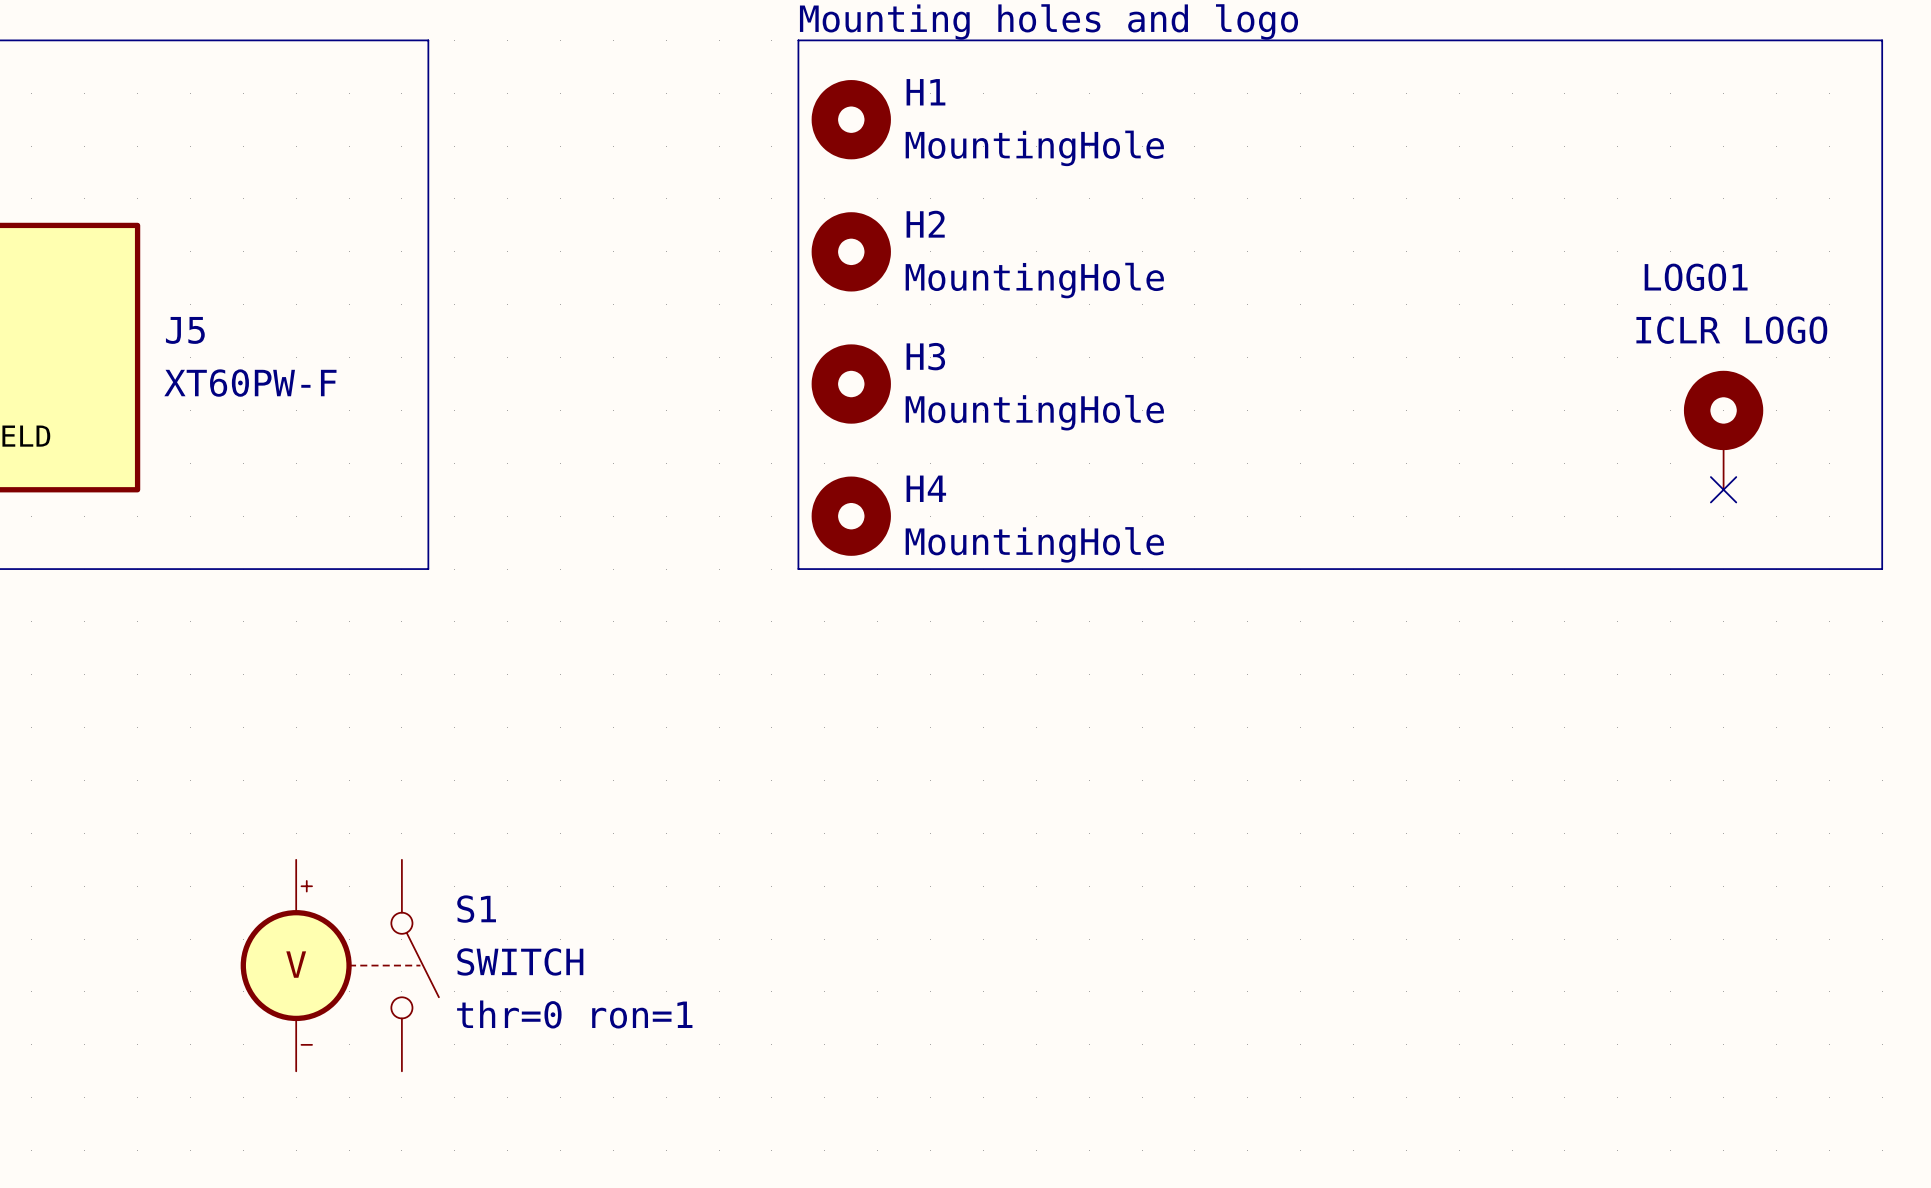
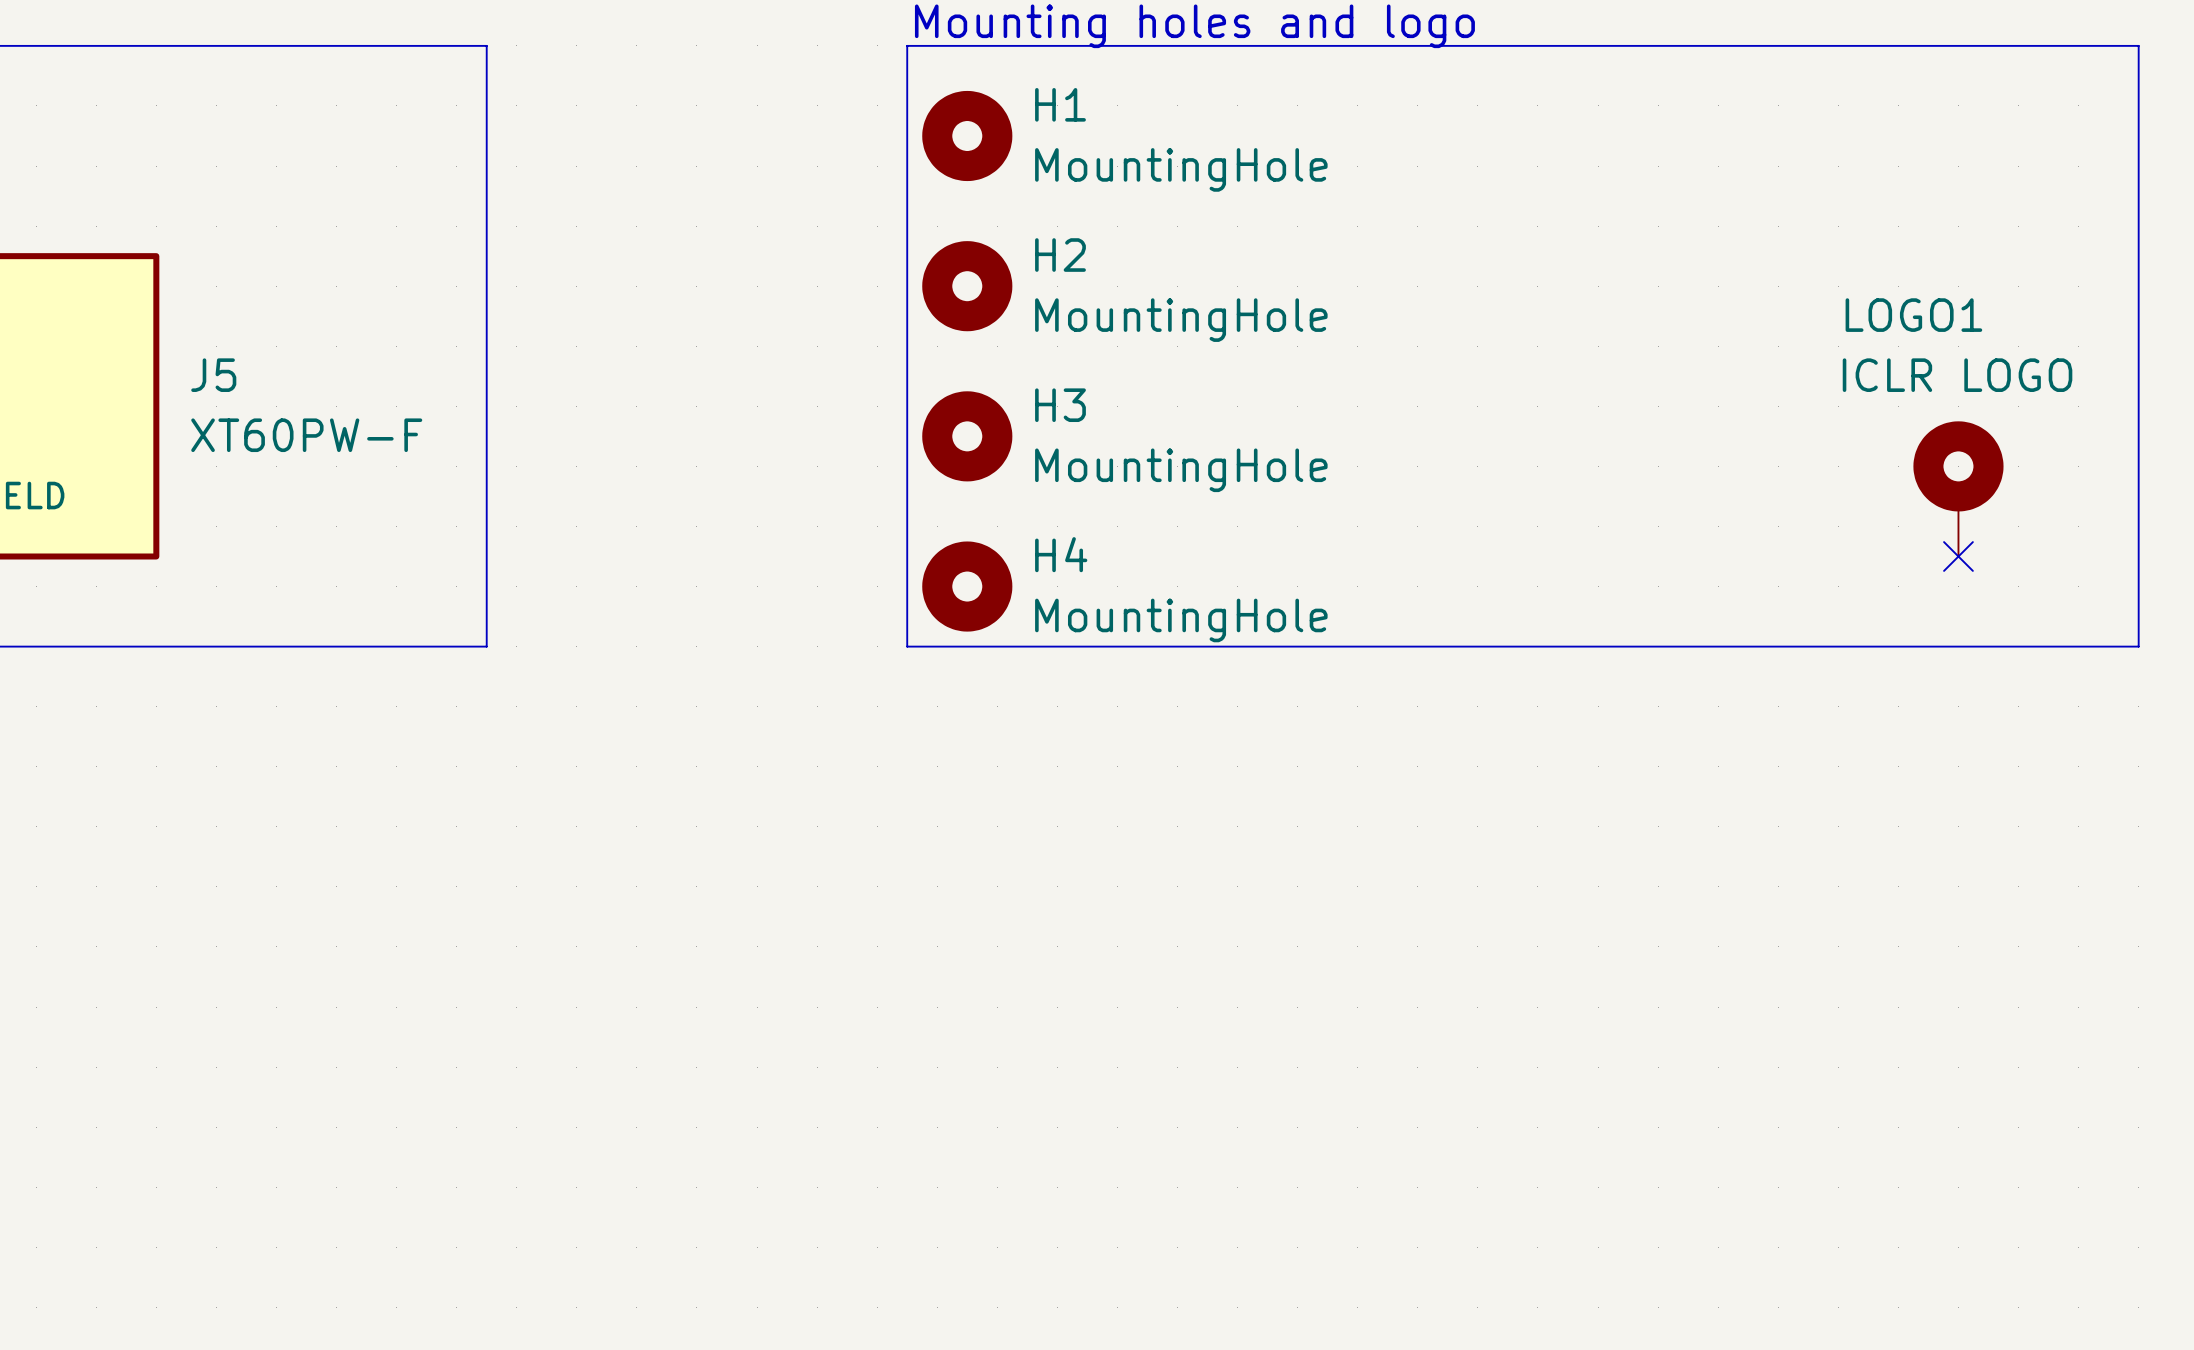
S1: SWITCH (339, 965) -> none

